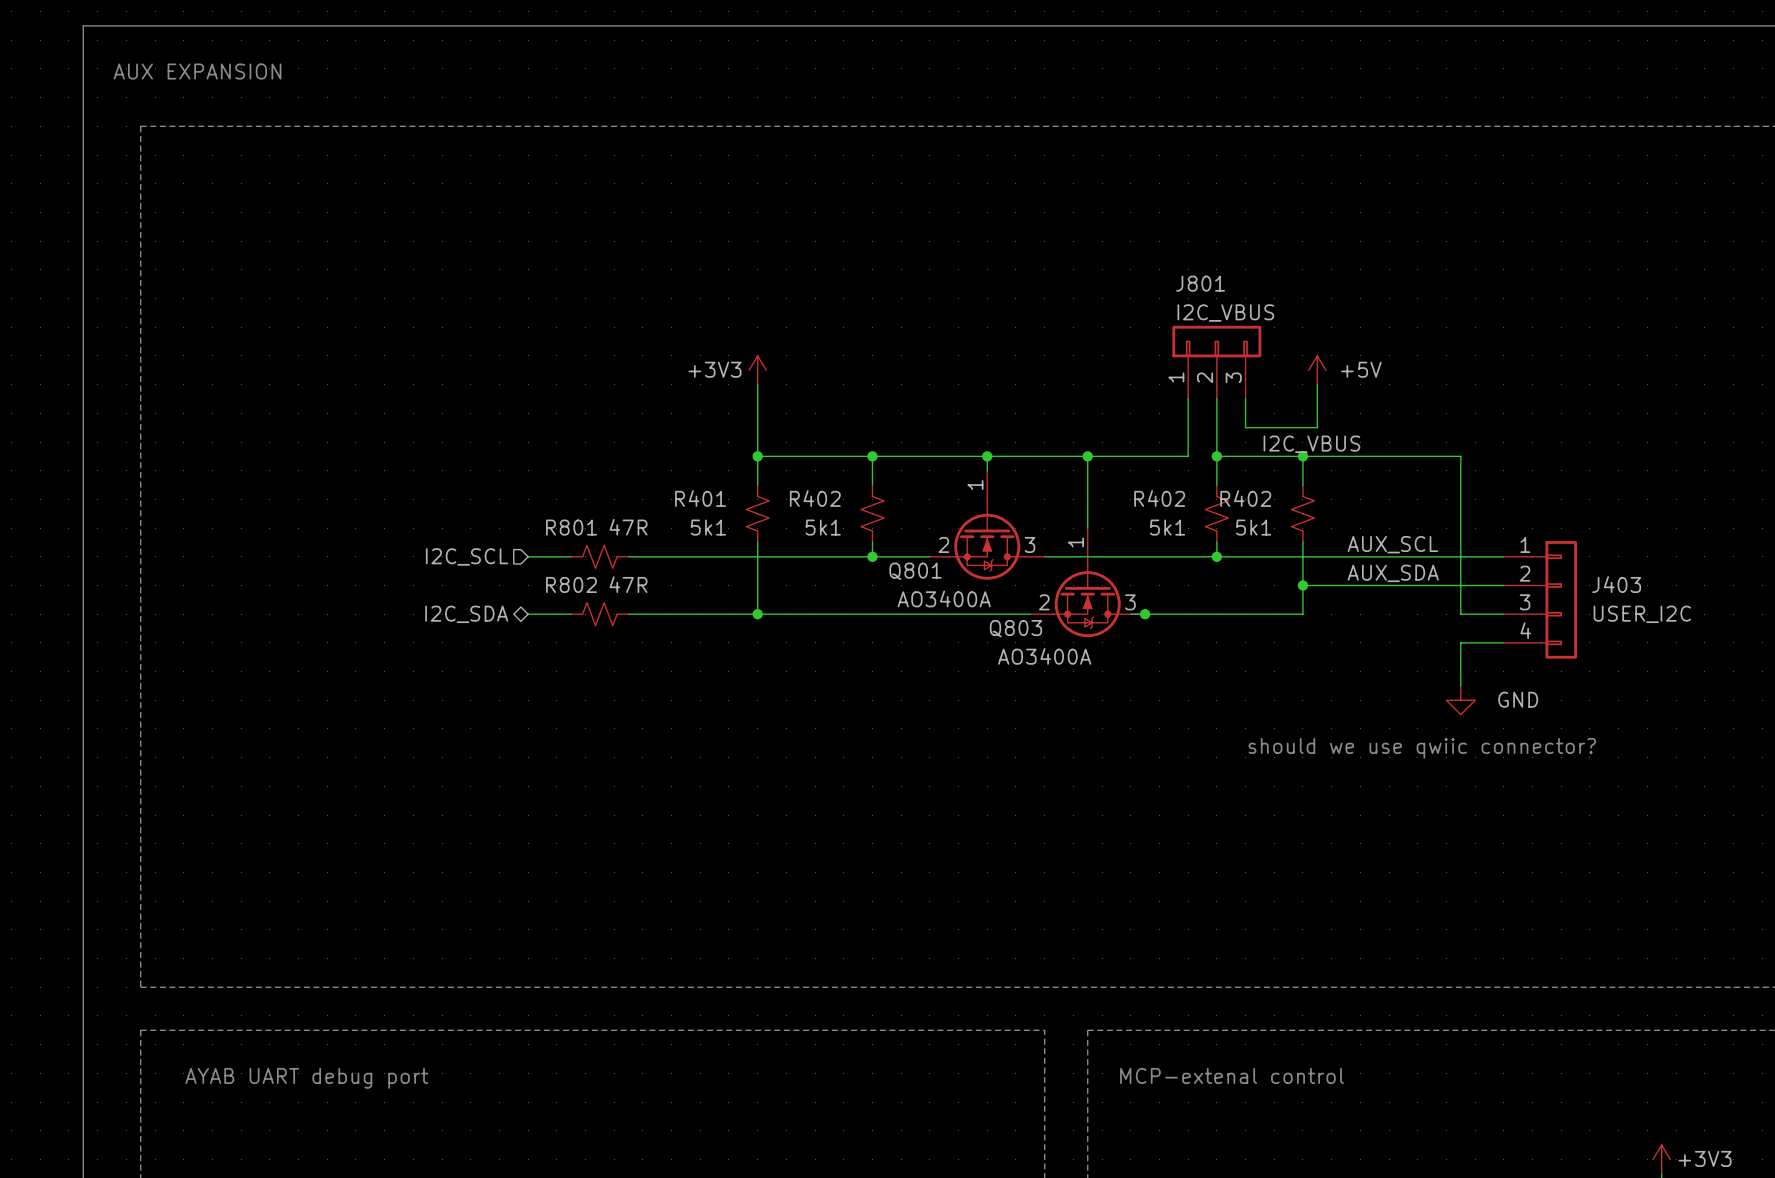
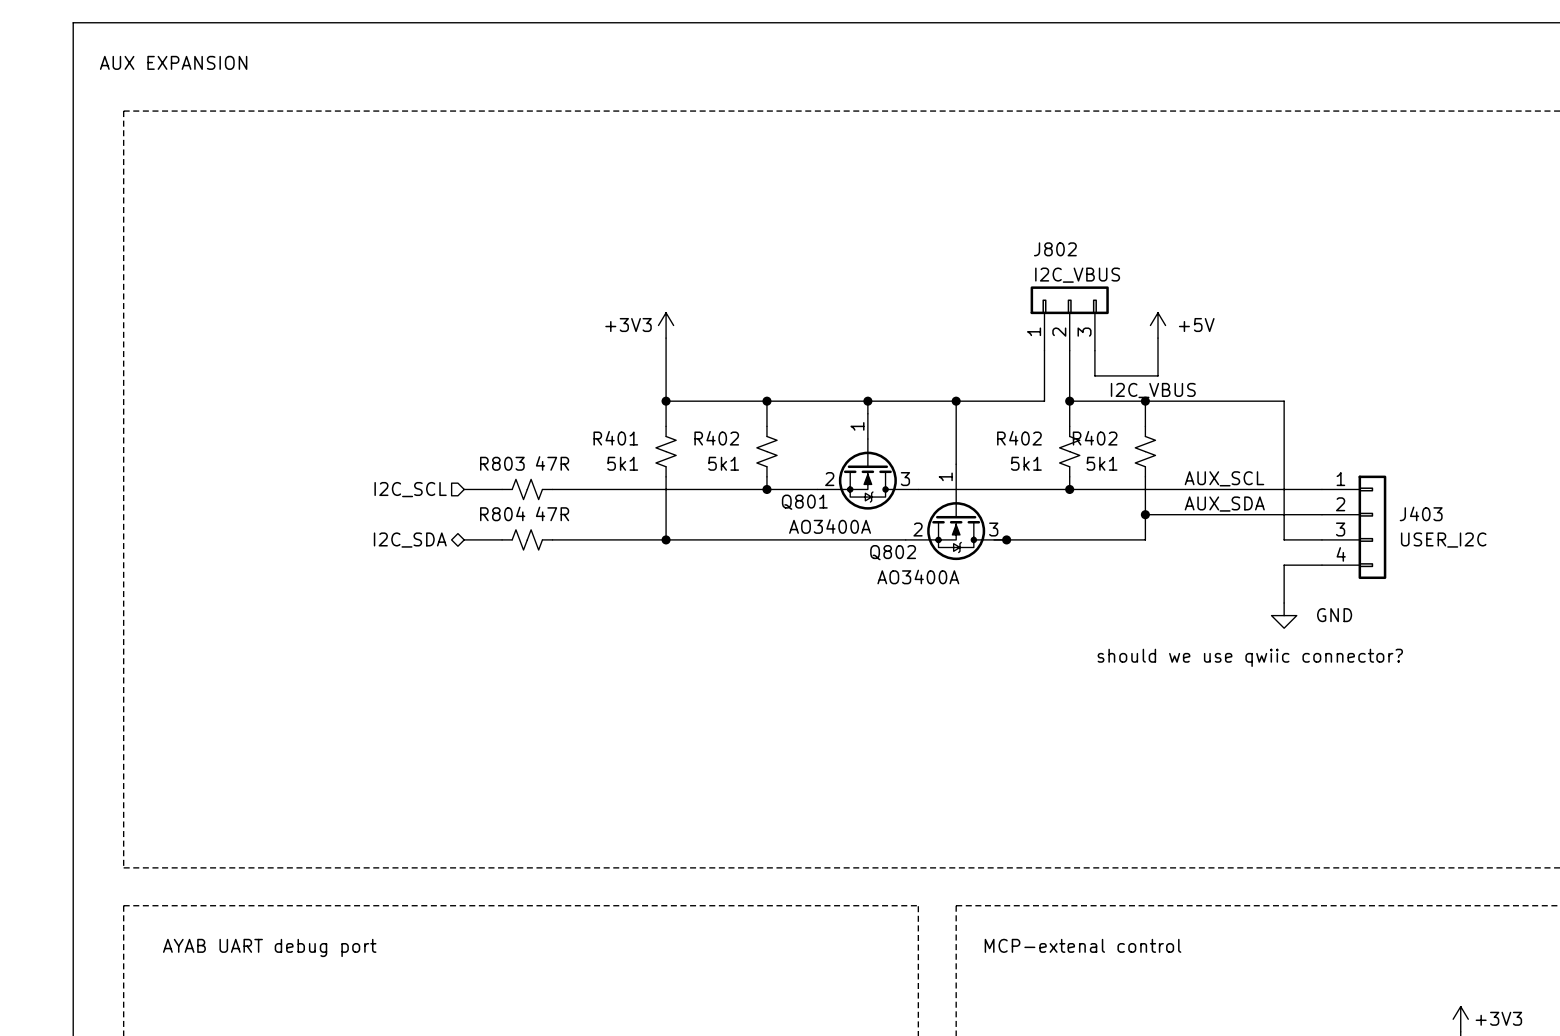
J801 name: J801 (1200, 283) -> J802 (1055, 249)
R801 name: R801 (571, 527) -> R803 (502, 463)
R802 name: R802 (571, 584) -> R804 (502, 513)
Q803 name: Q803 (1015, 628) -> Q802 (893, 552)

